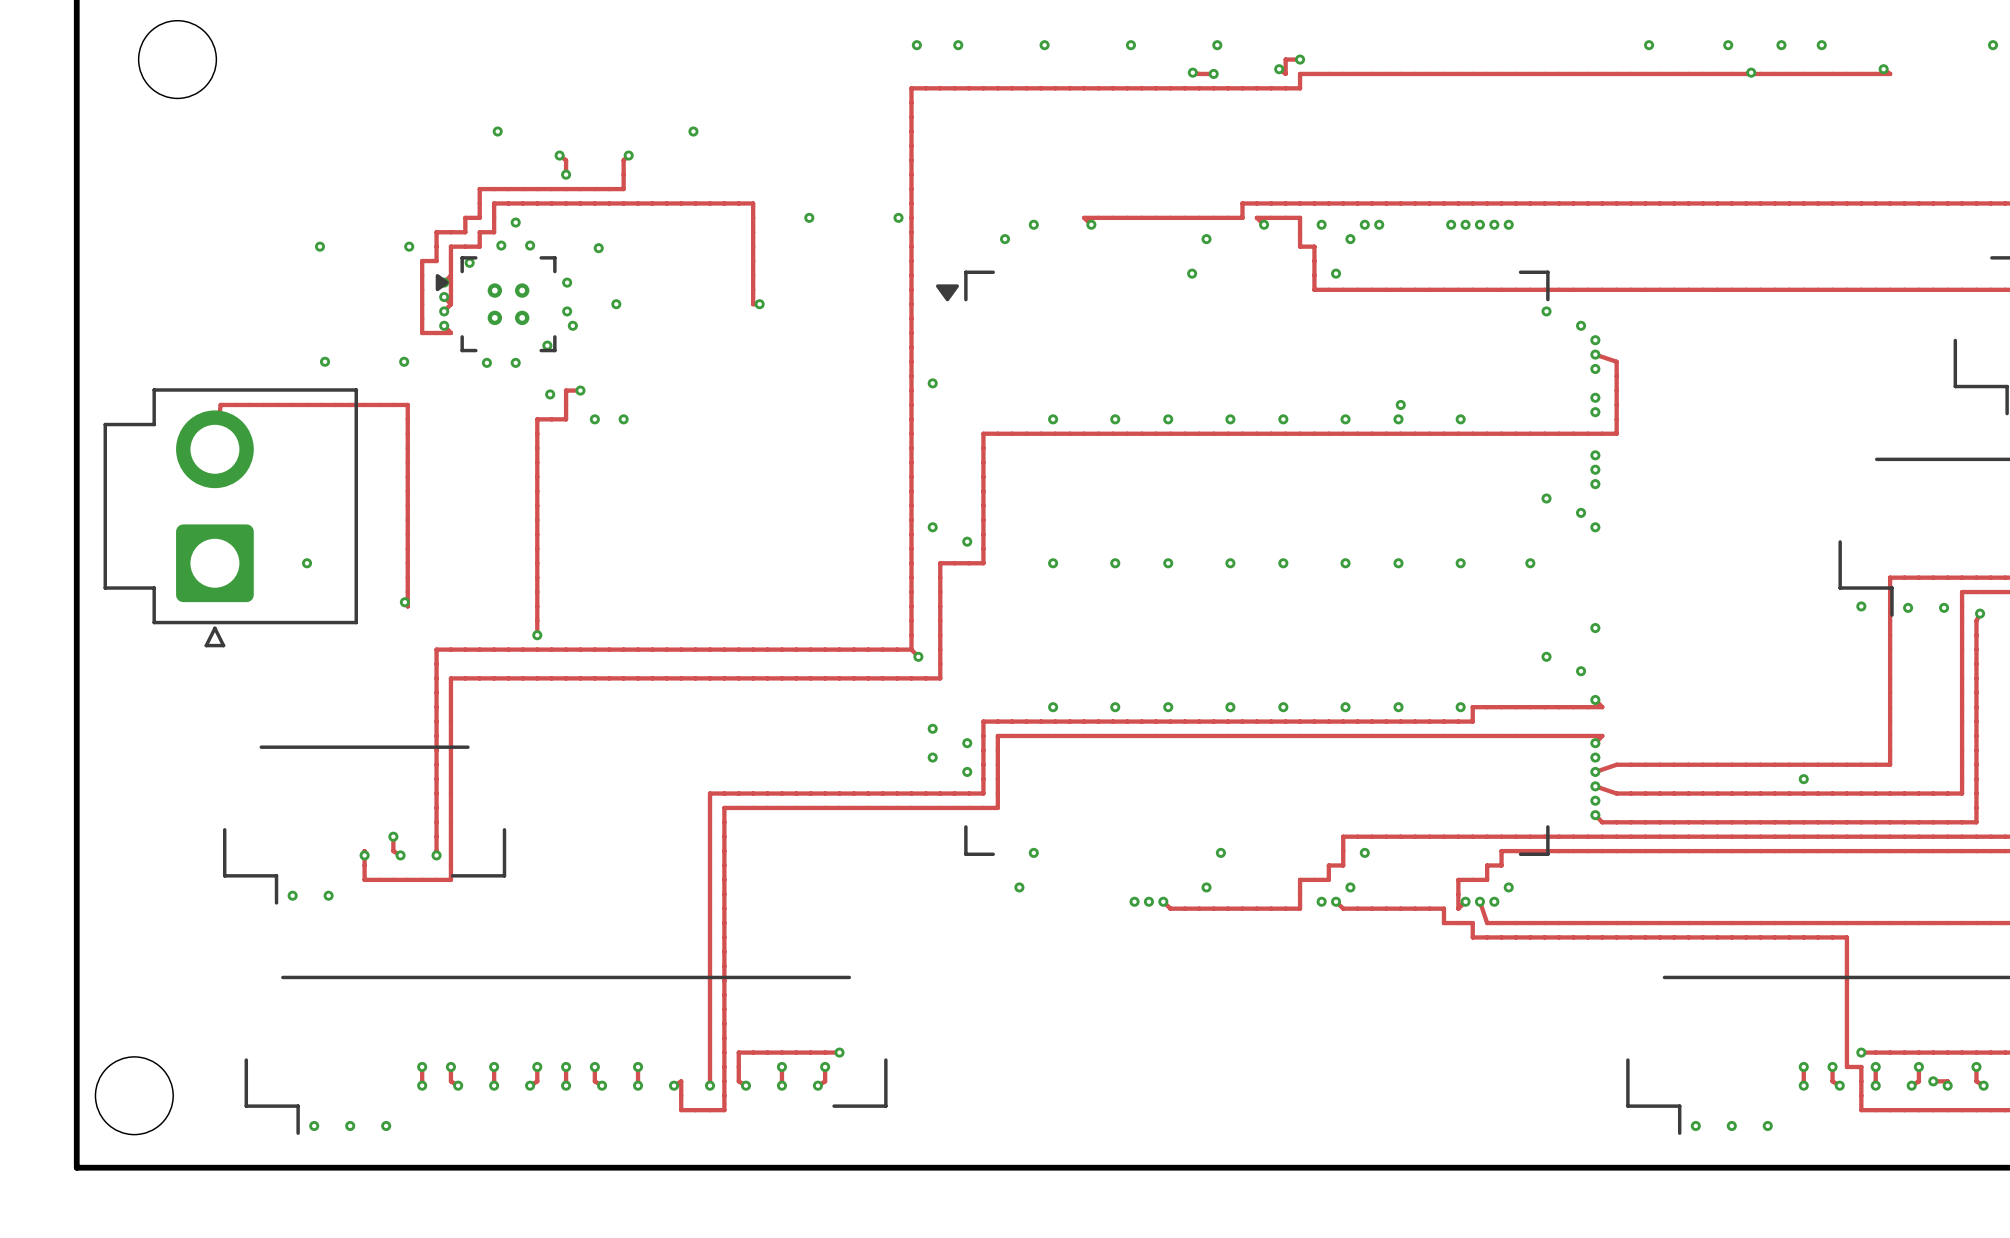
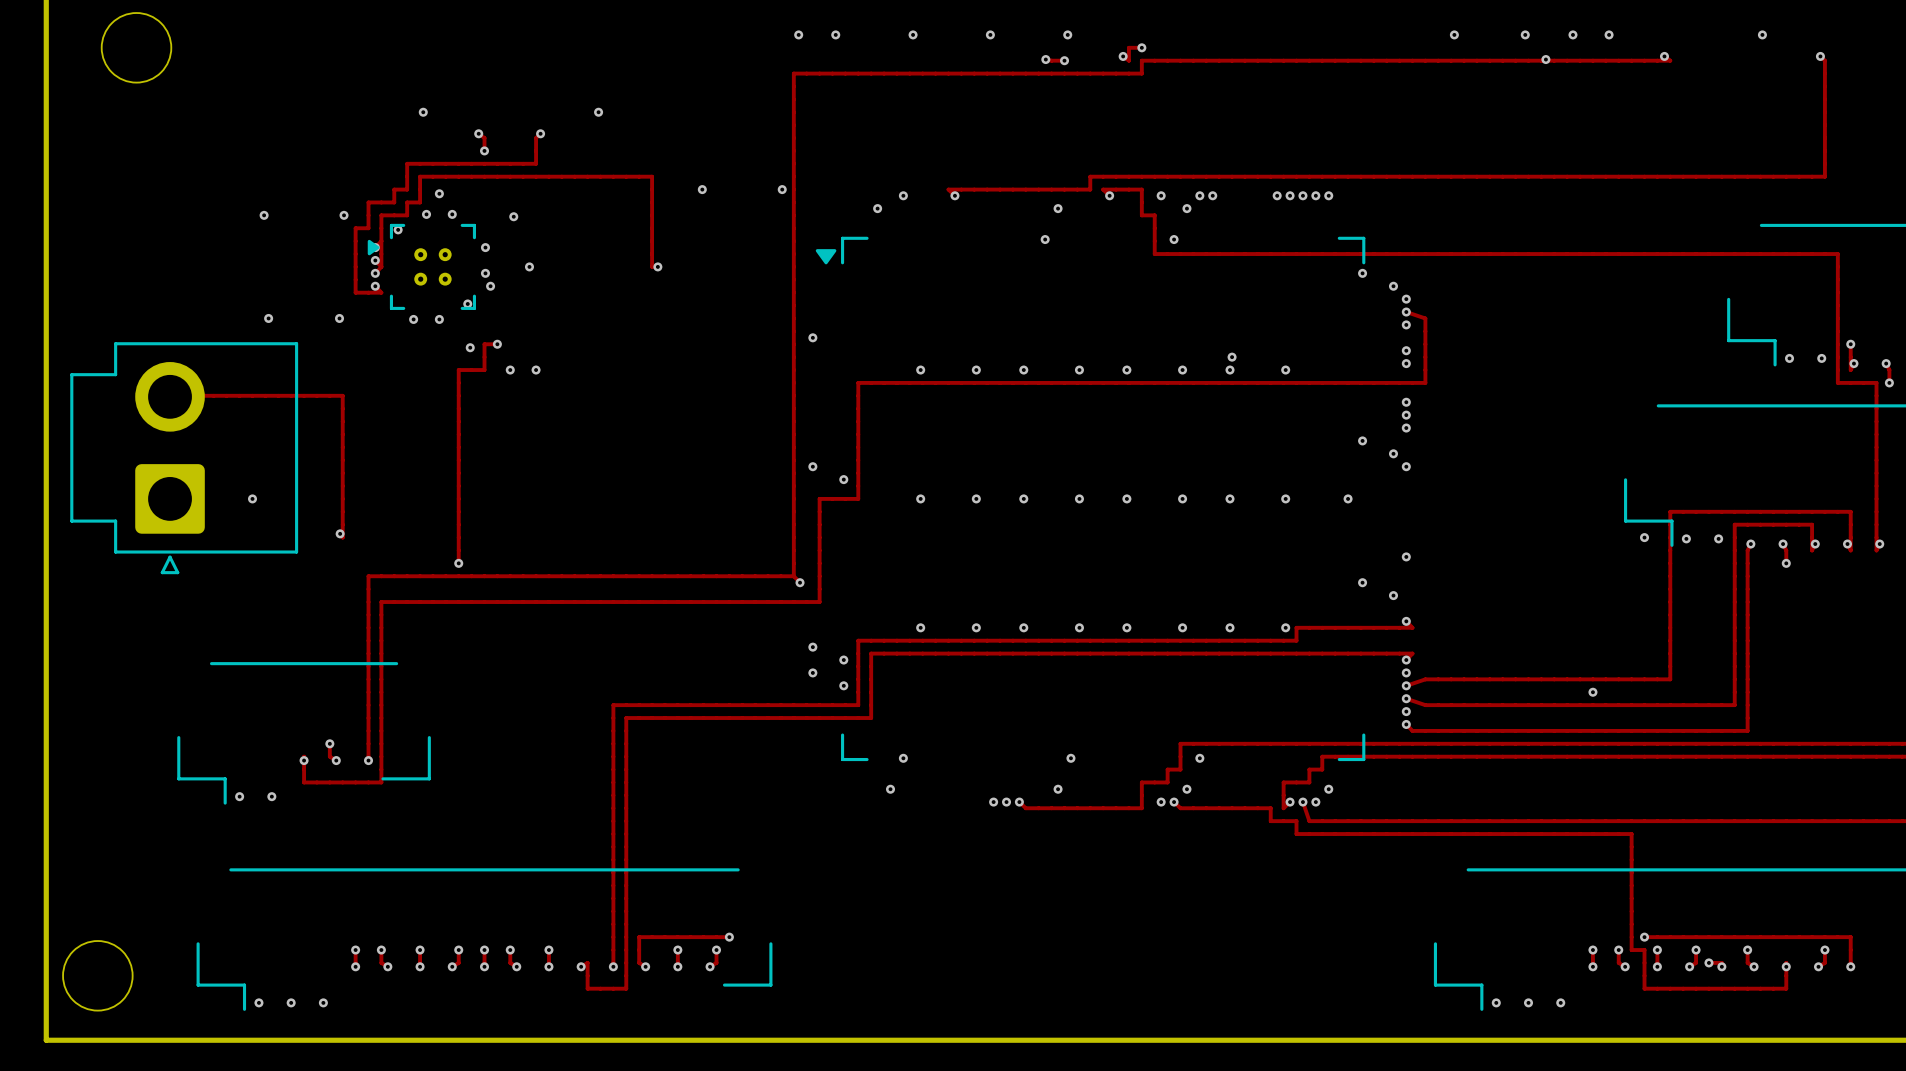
track: (407, 448) (407, 404) (220, 404) (214, 449) -> (342, 395) (170, 396)

